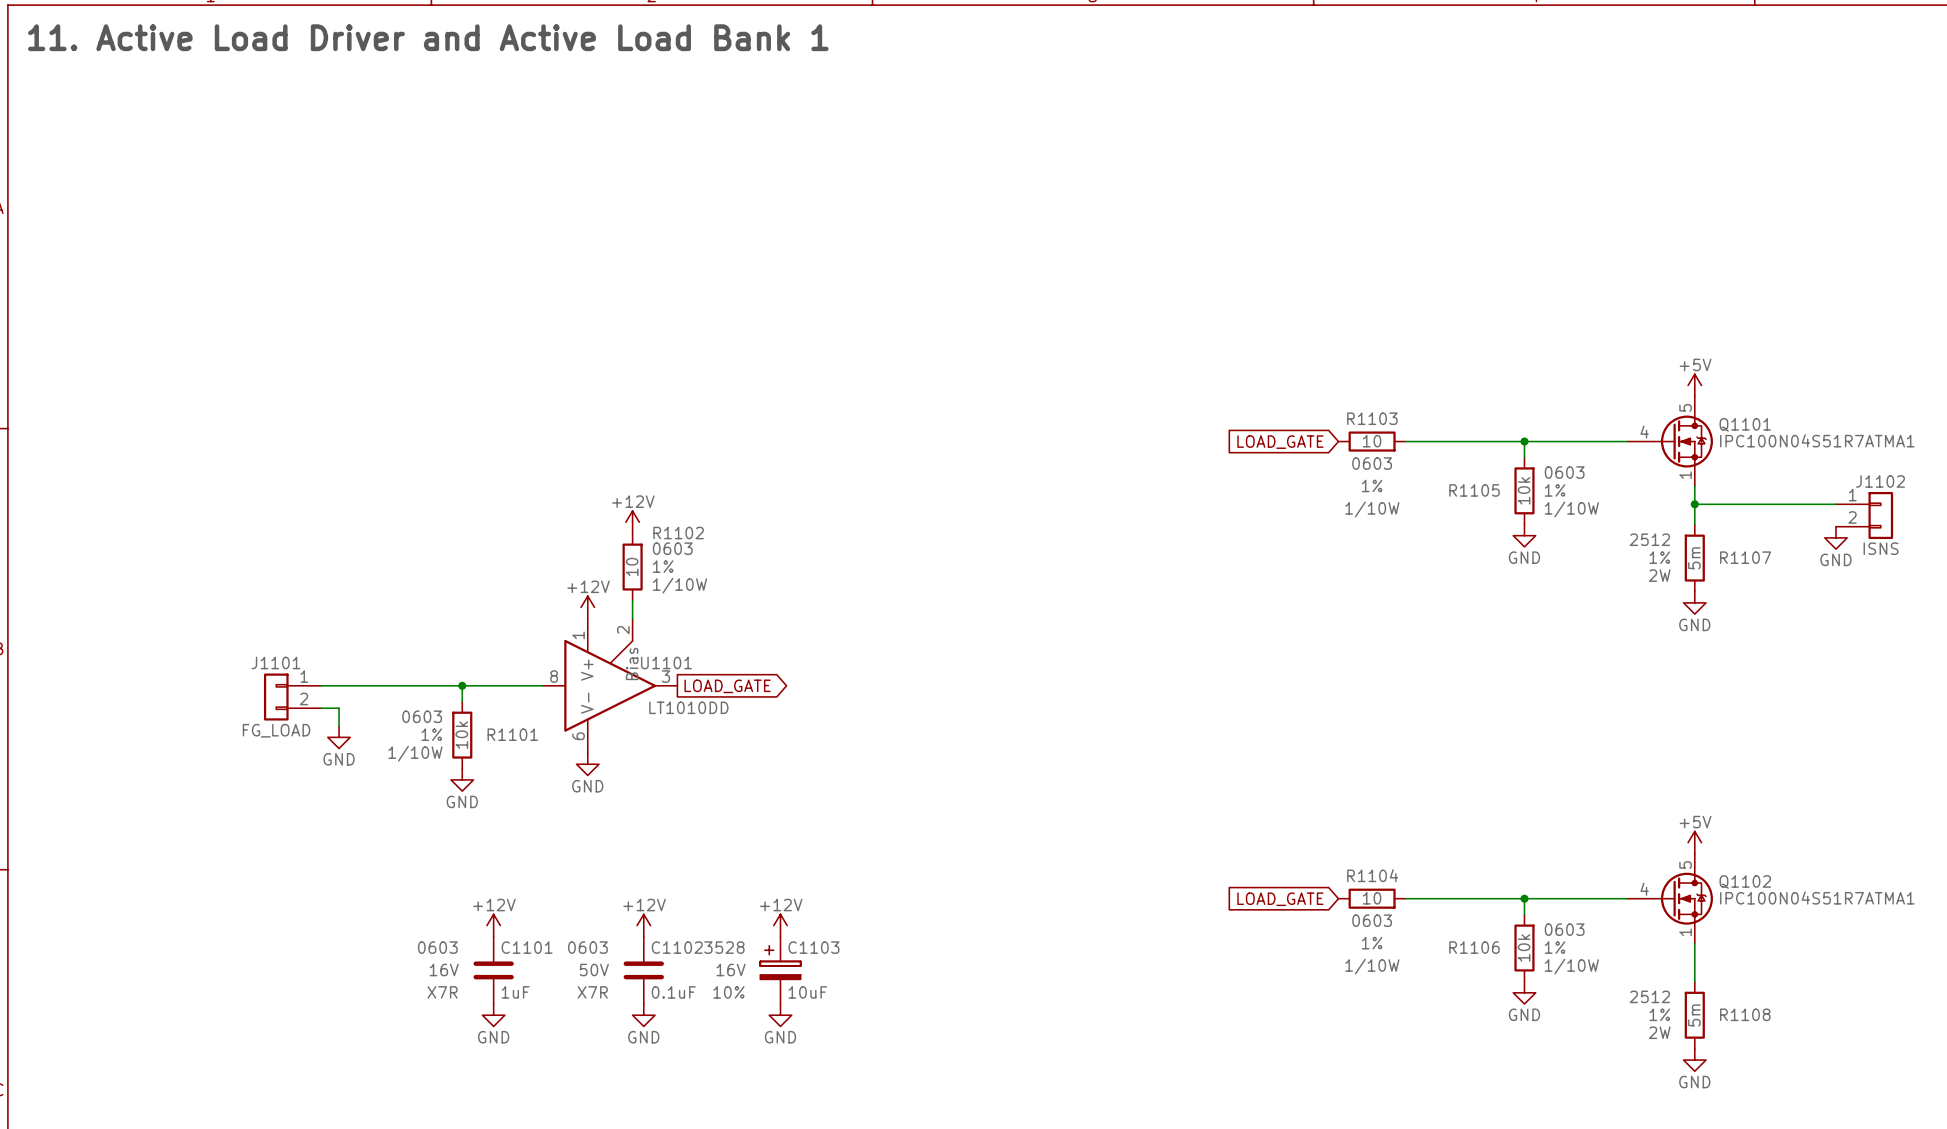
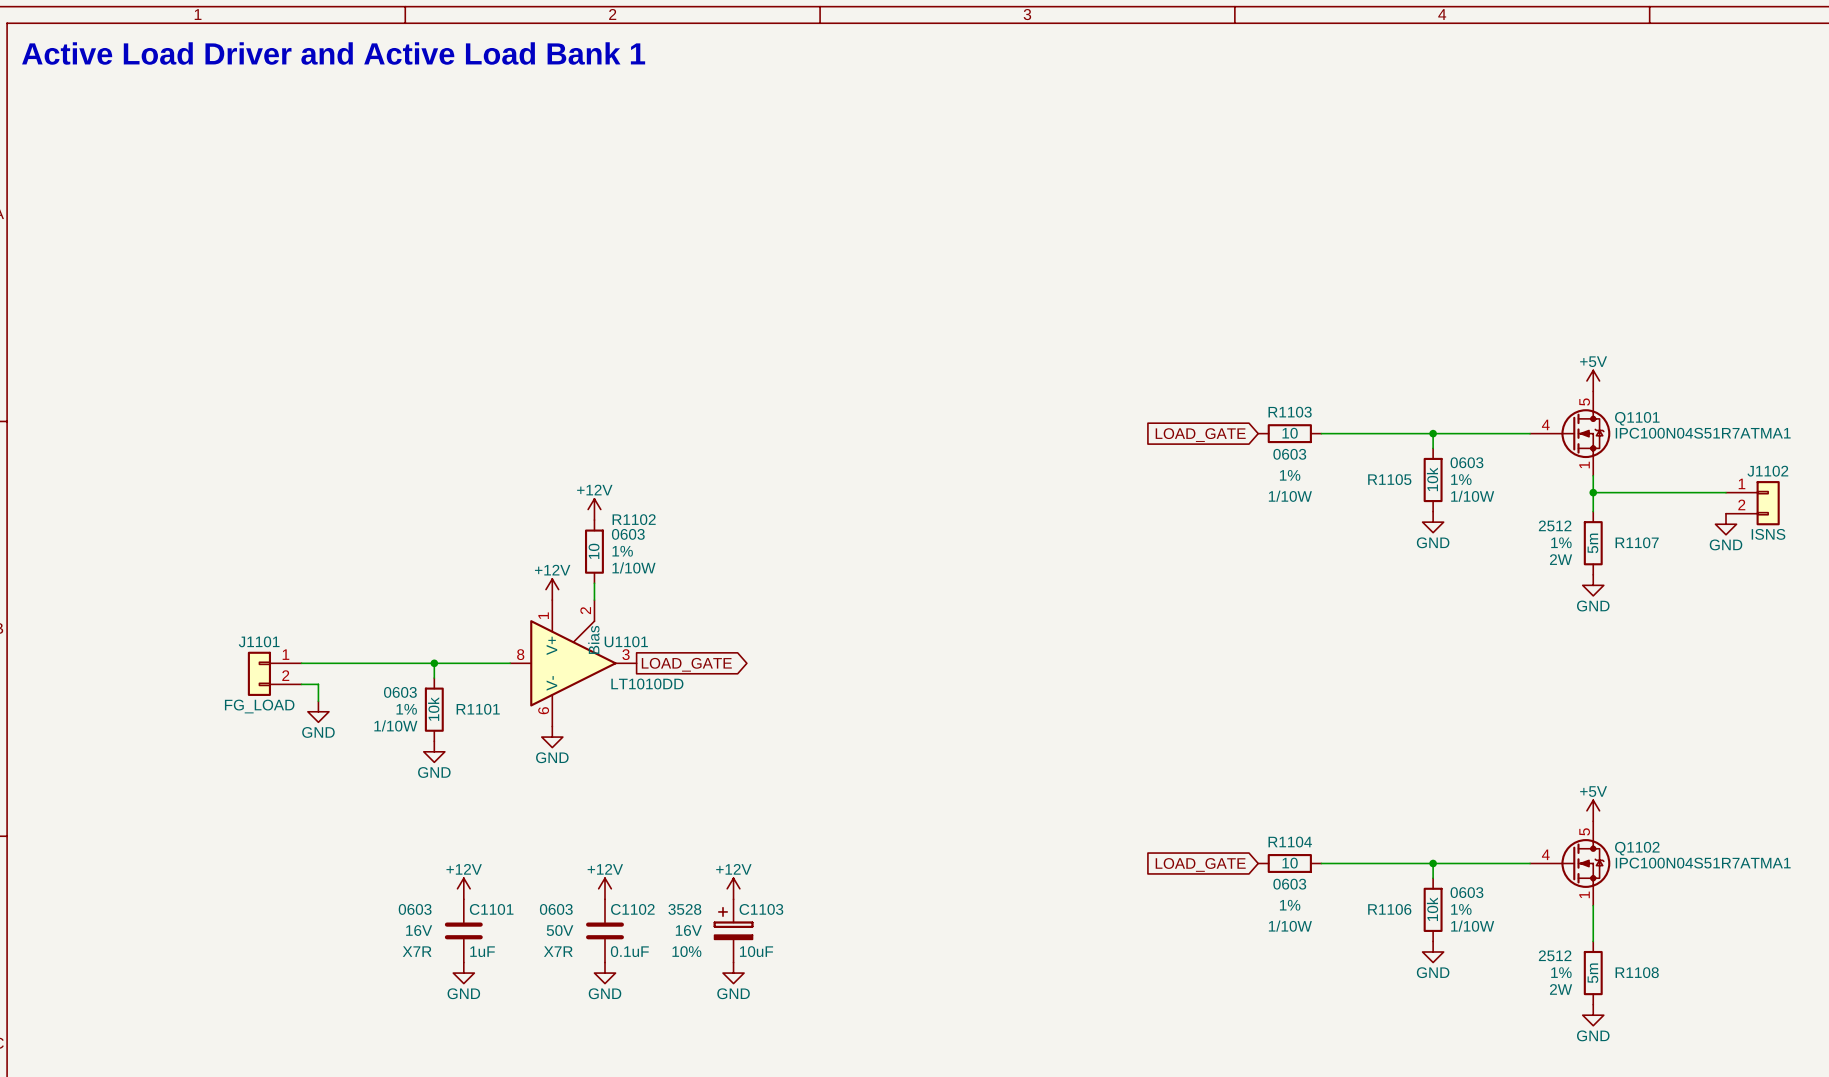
text: 11. Active Load Driver and Active Load Bank 1 (428, 37) -> Active Load Driver and Active Load Bank 1 (333, 53)

